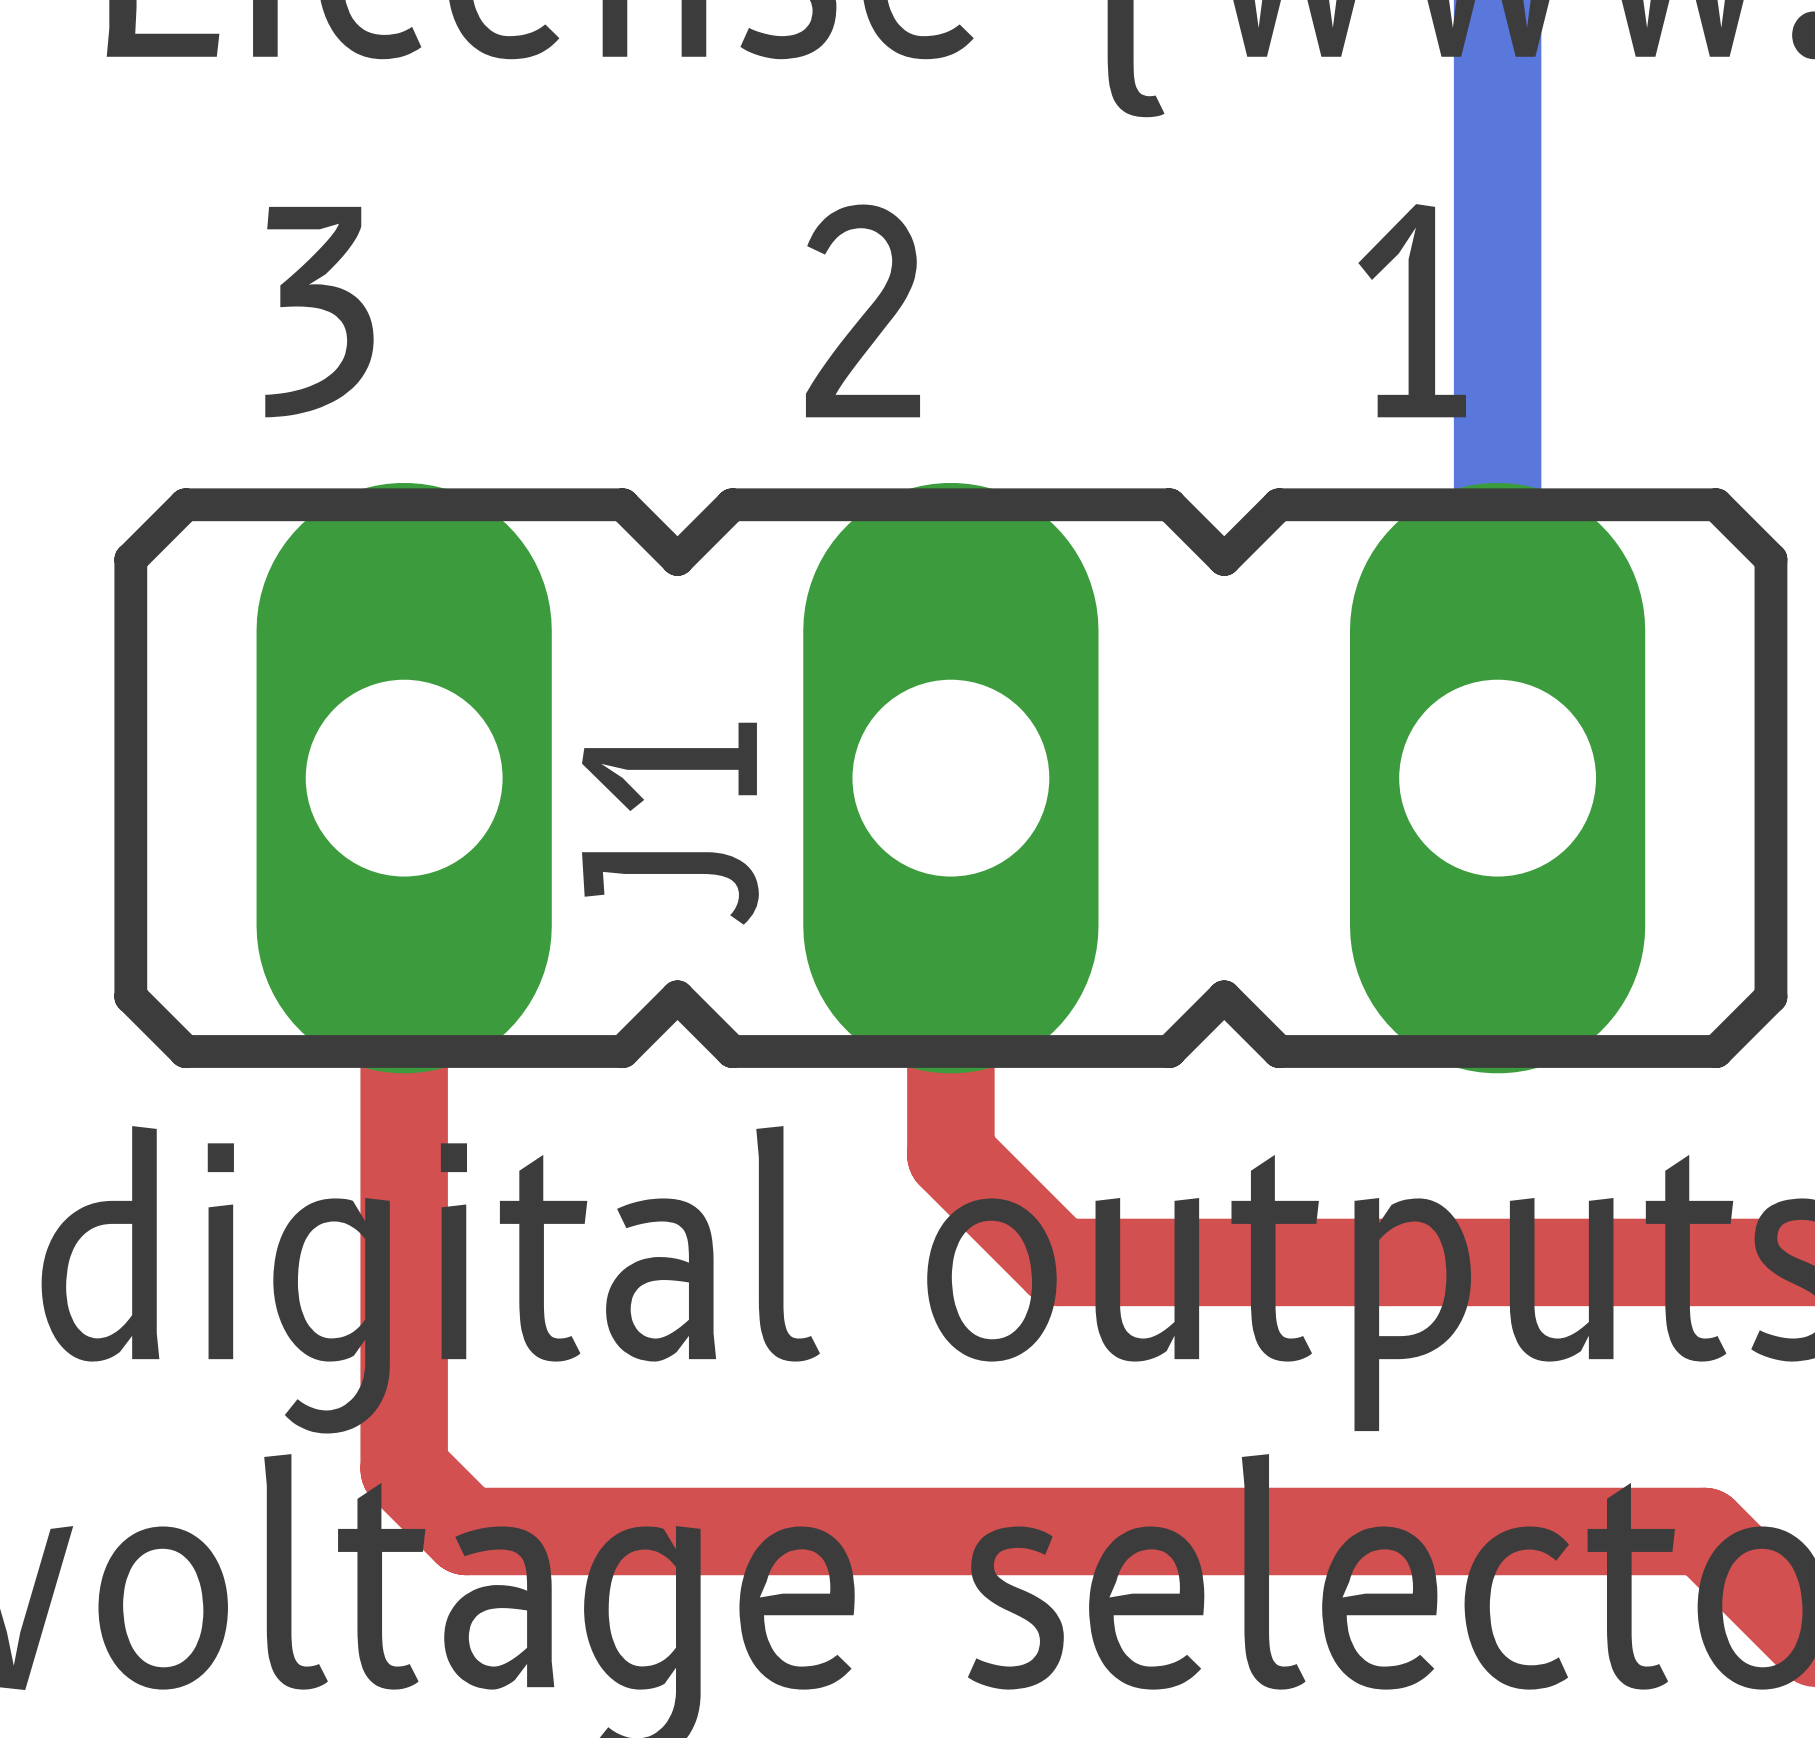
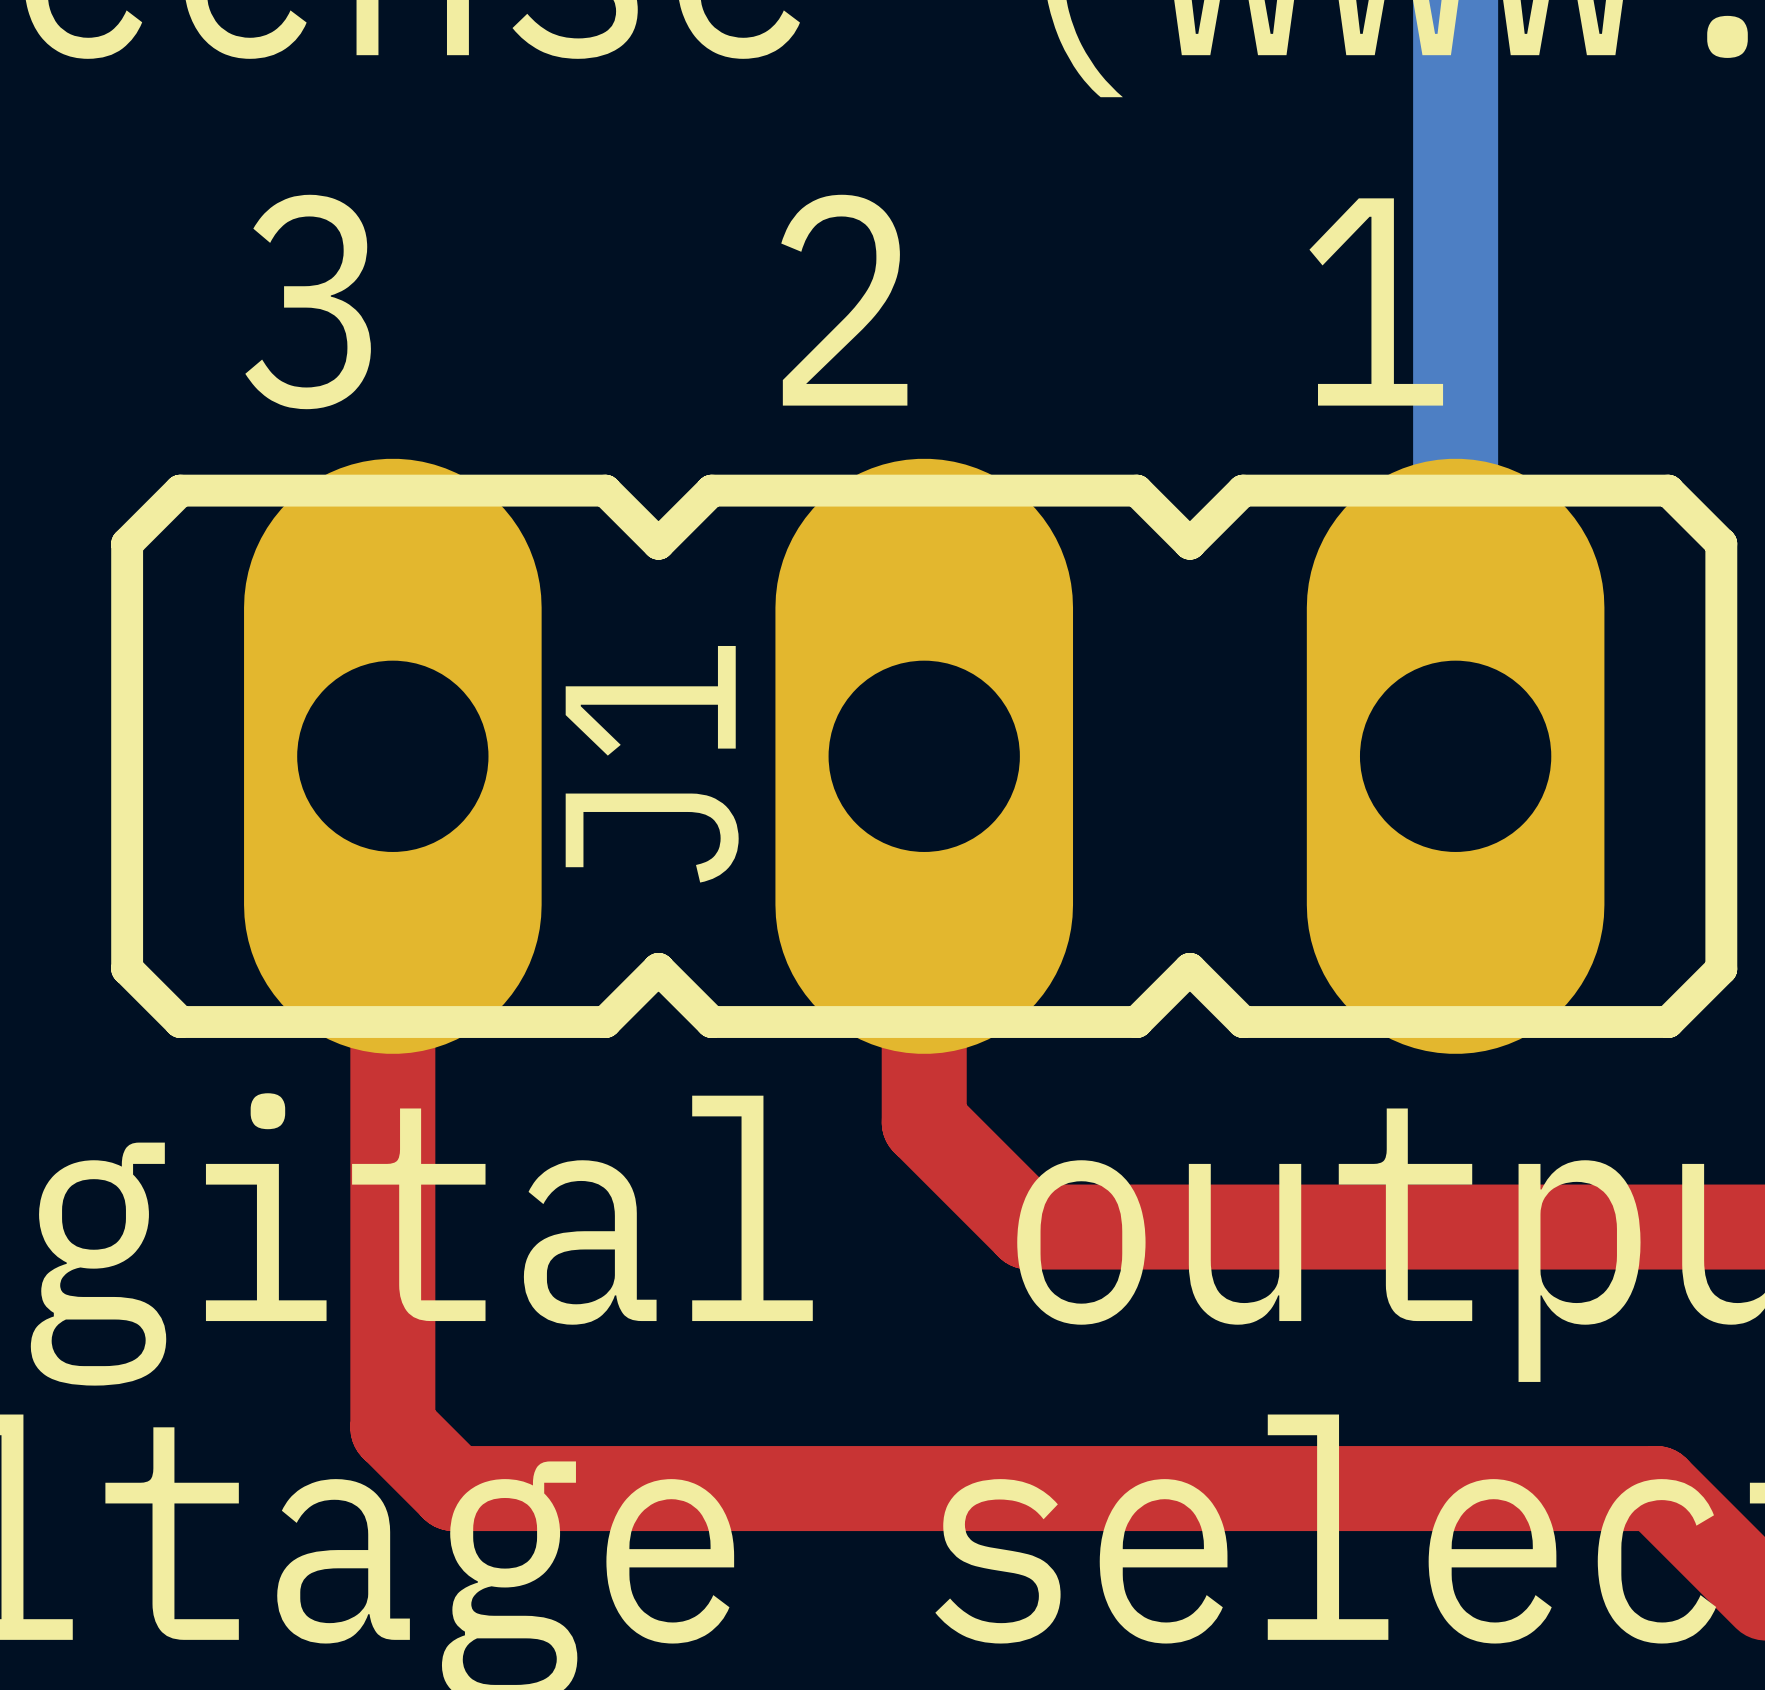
J1 footprint: [114, 482, 1788, 1074] -> [111, 458, 1738, 1054]

